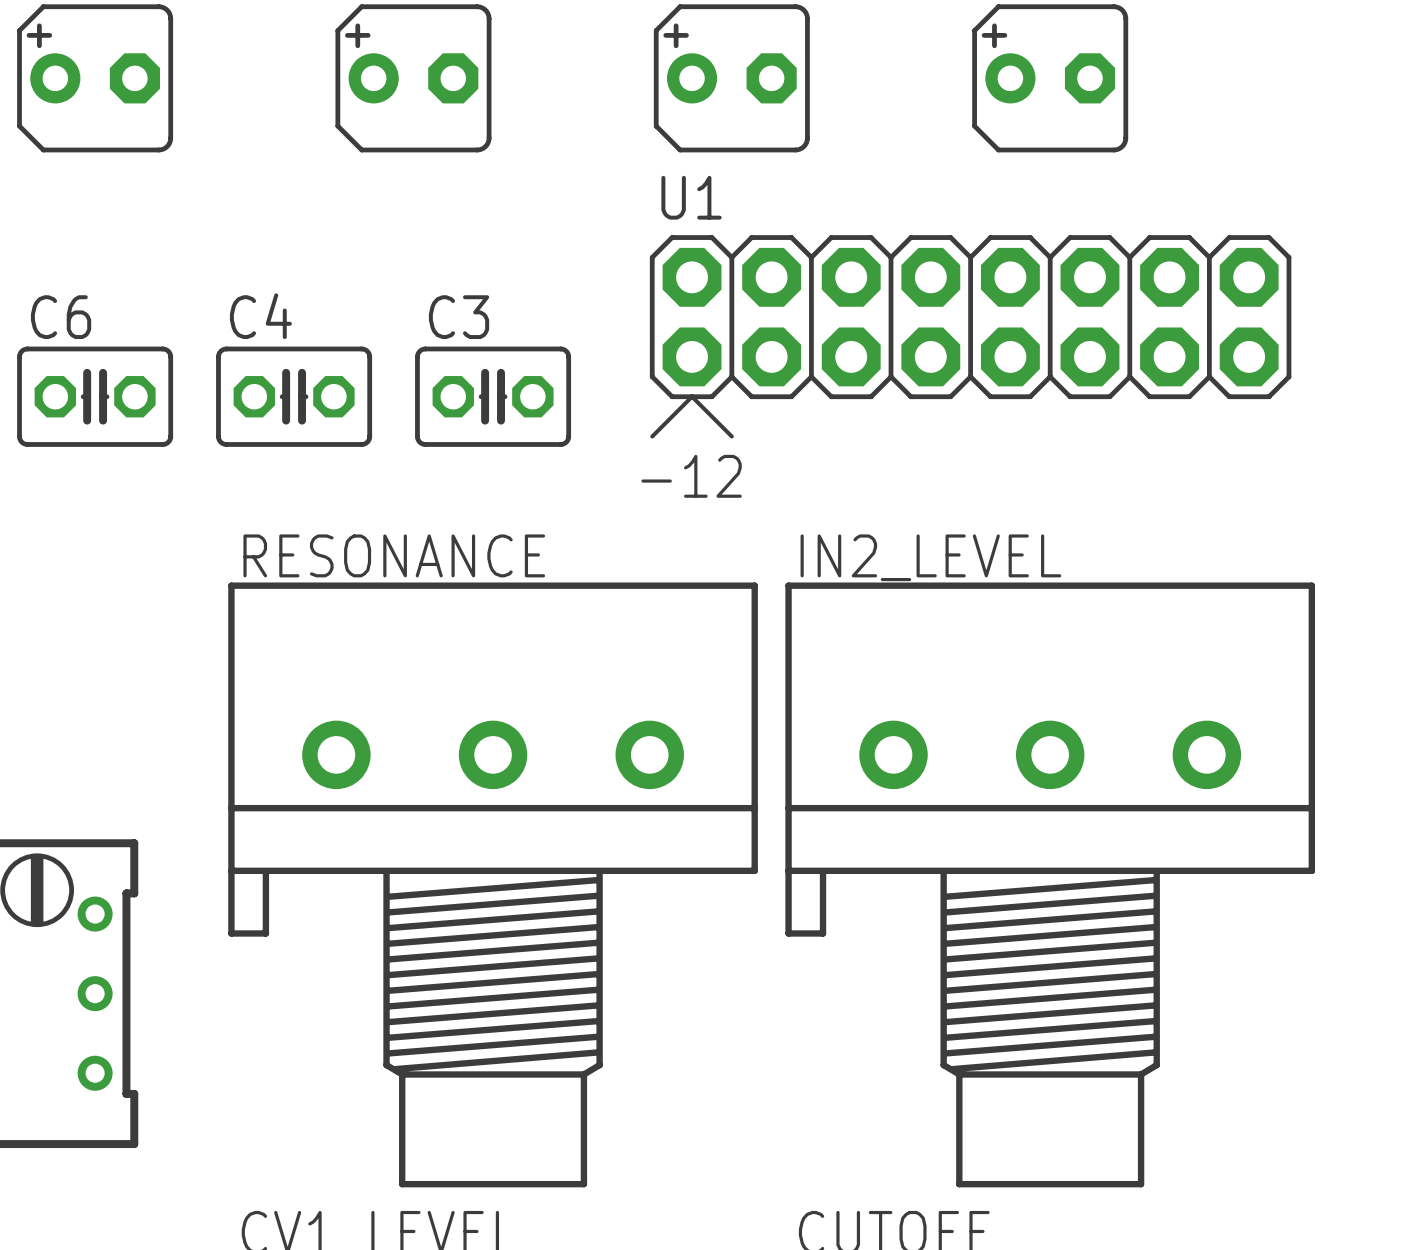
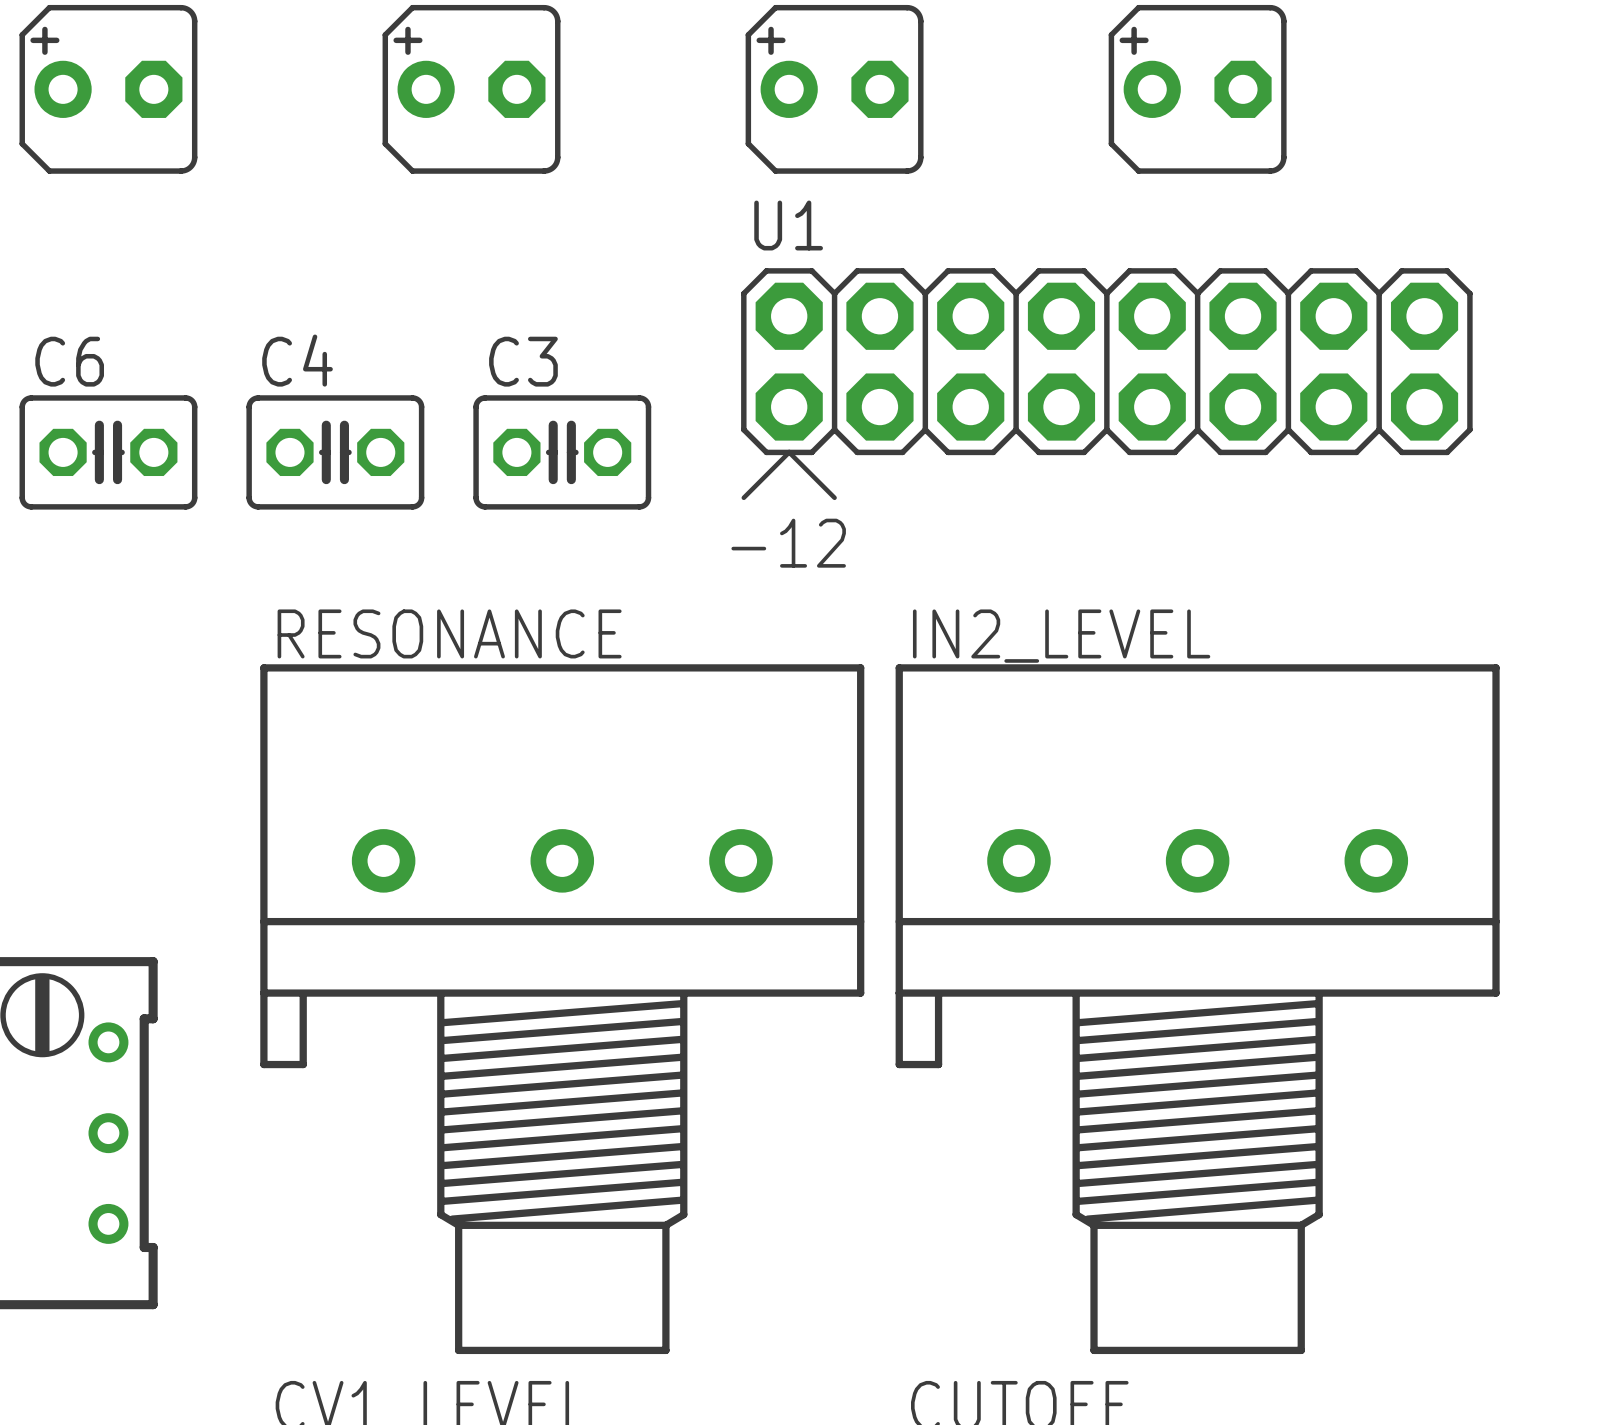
RESONANCE footprint: [228, 582, 758, 1188] -> [260, 664, 865, 1355]
IN2_LEVEL footprint: [785, 582, 1316, 1188] -> [895, 664, 1500, 1355]

